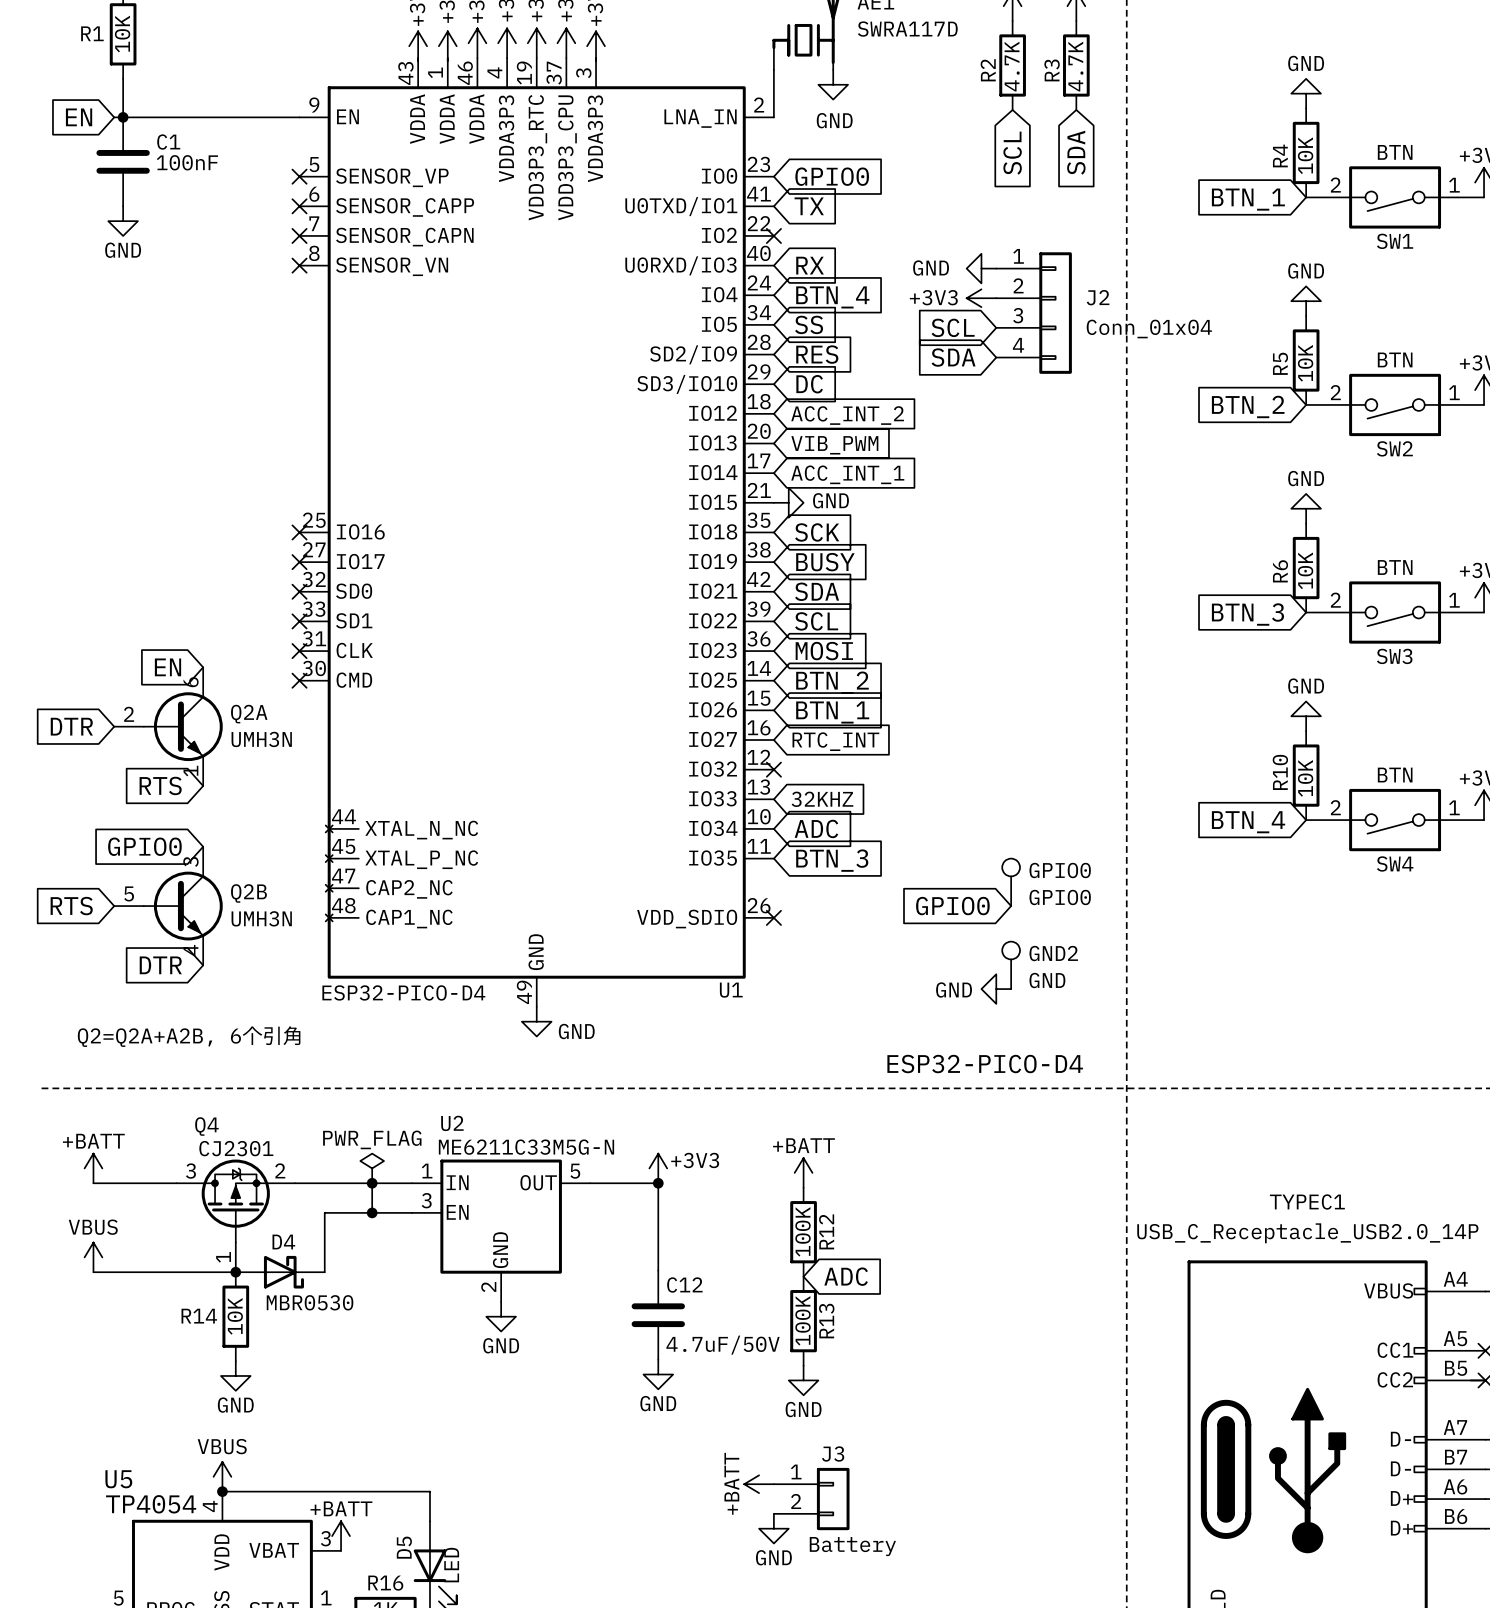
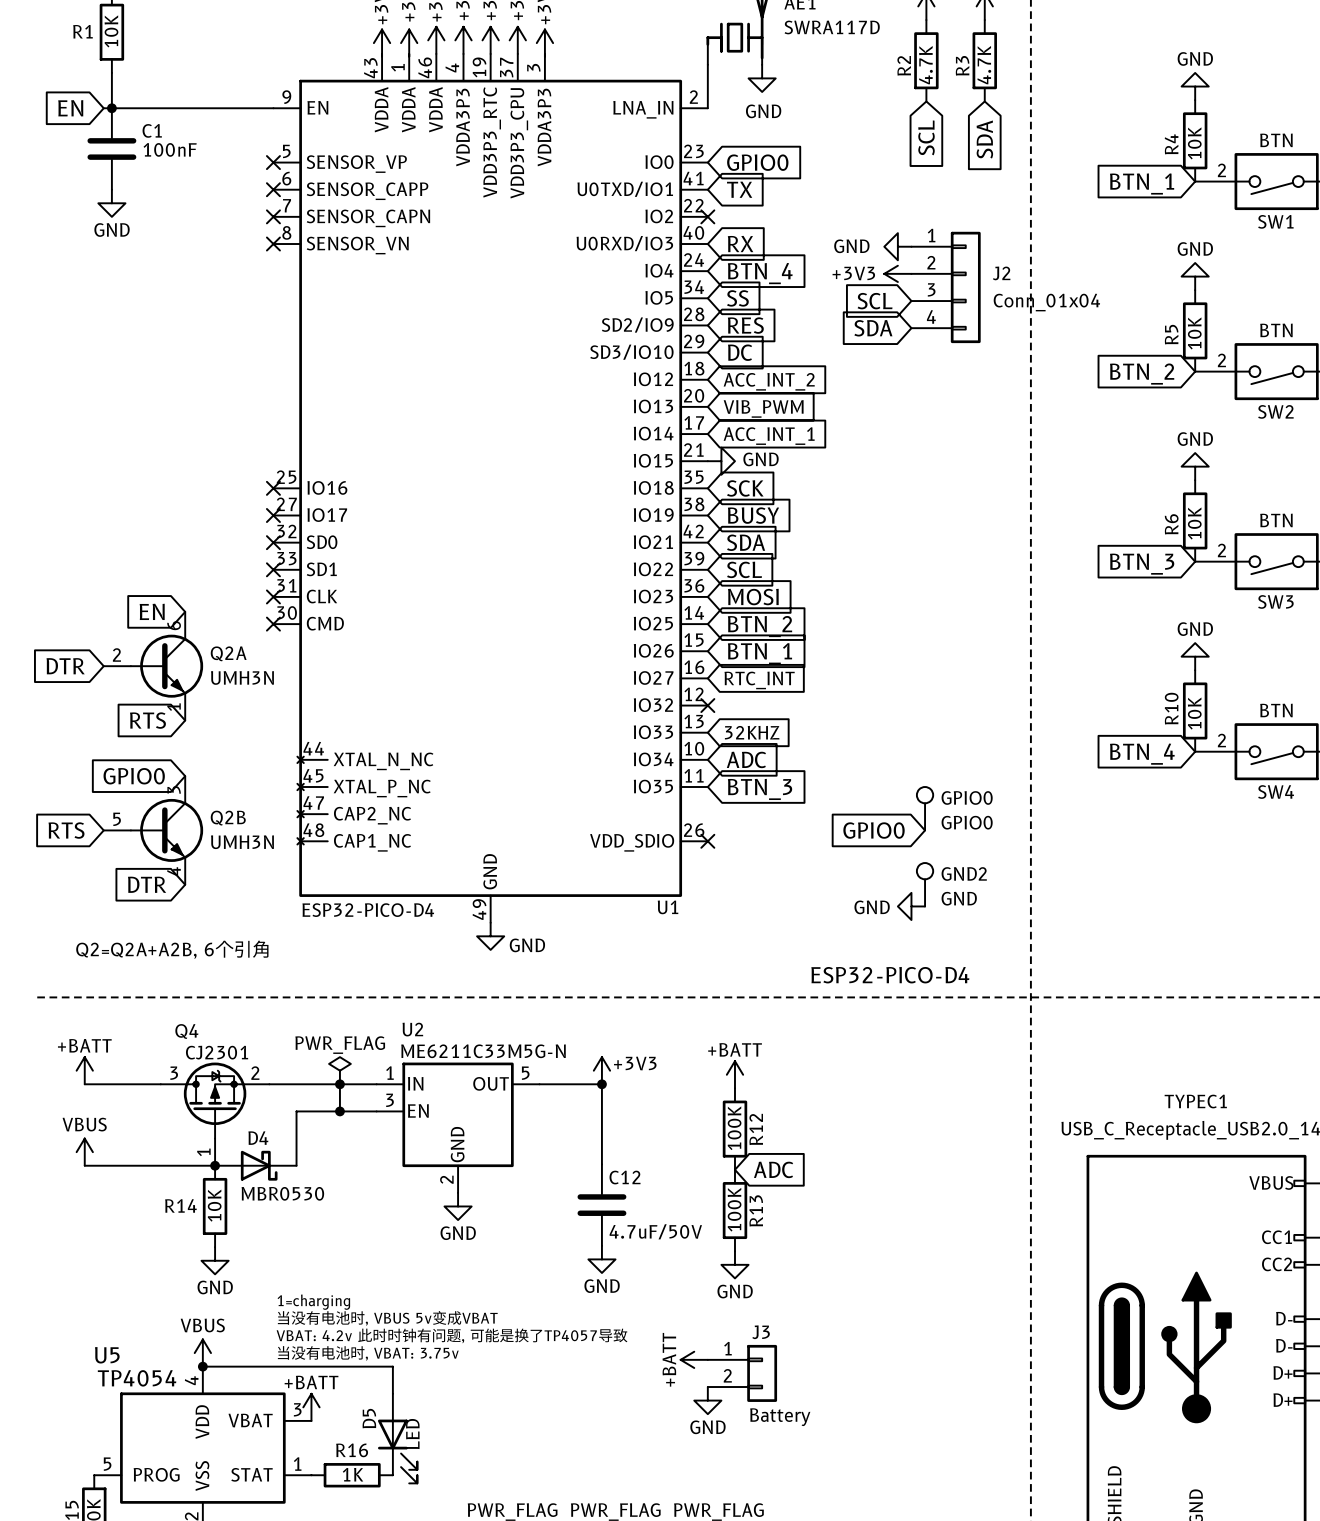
text: none -> 1=charging (313, 1302)
text: none -> 当没有电池时, VBUS 5v变成VBAT (387, 1318)
text: none -> VBAT: 4.2v 此时时钟有问题, 可能是换了TP4057导致 (452, 1335)
text: none -> 当没有电池时, VBAT: 3.75v (368, 1353)

